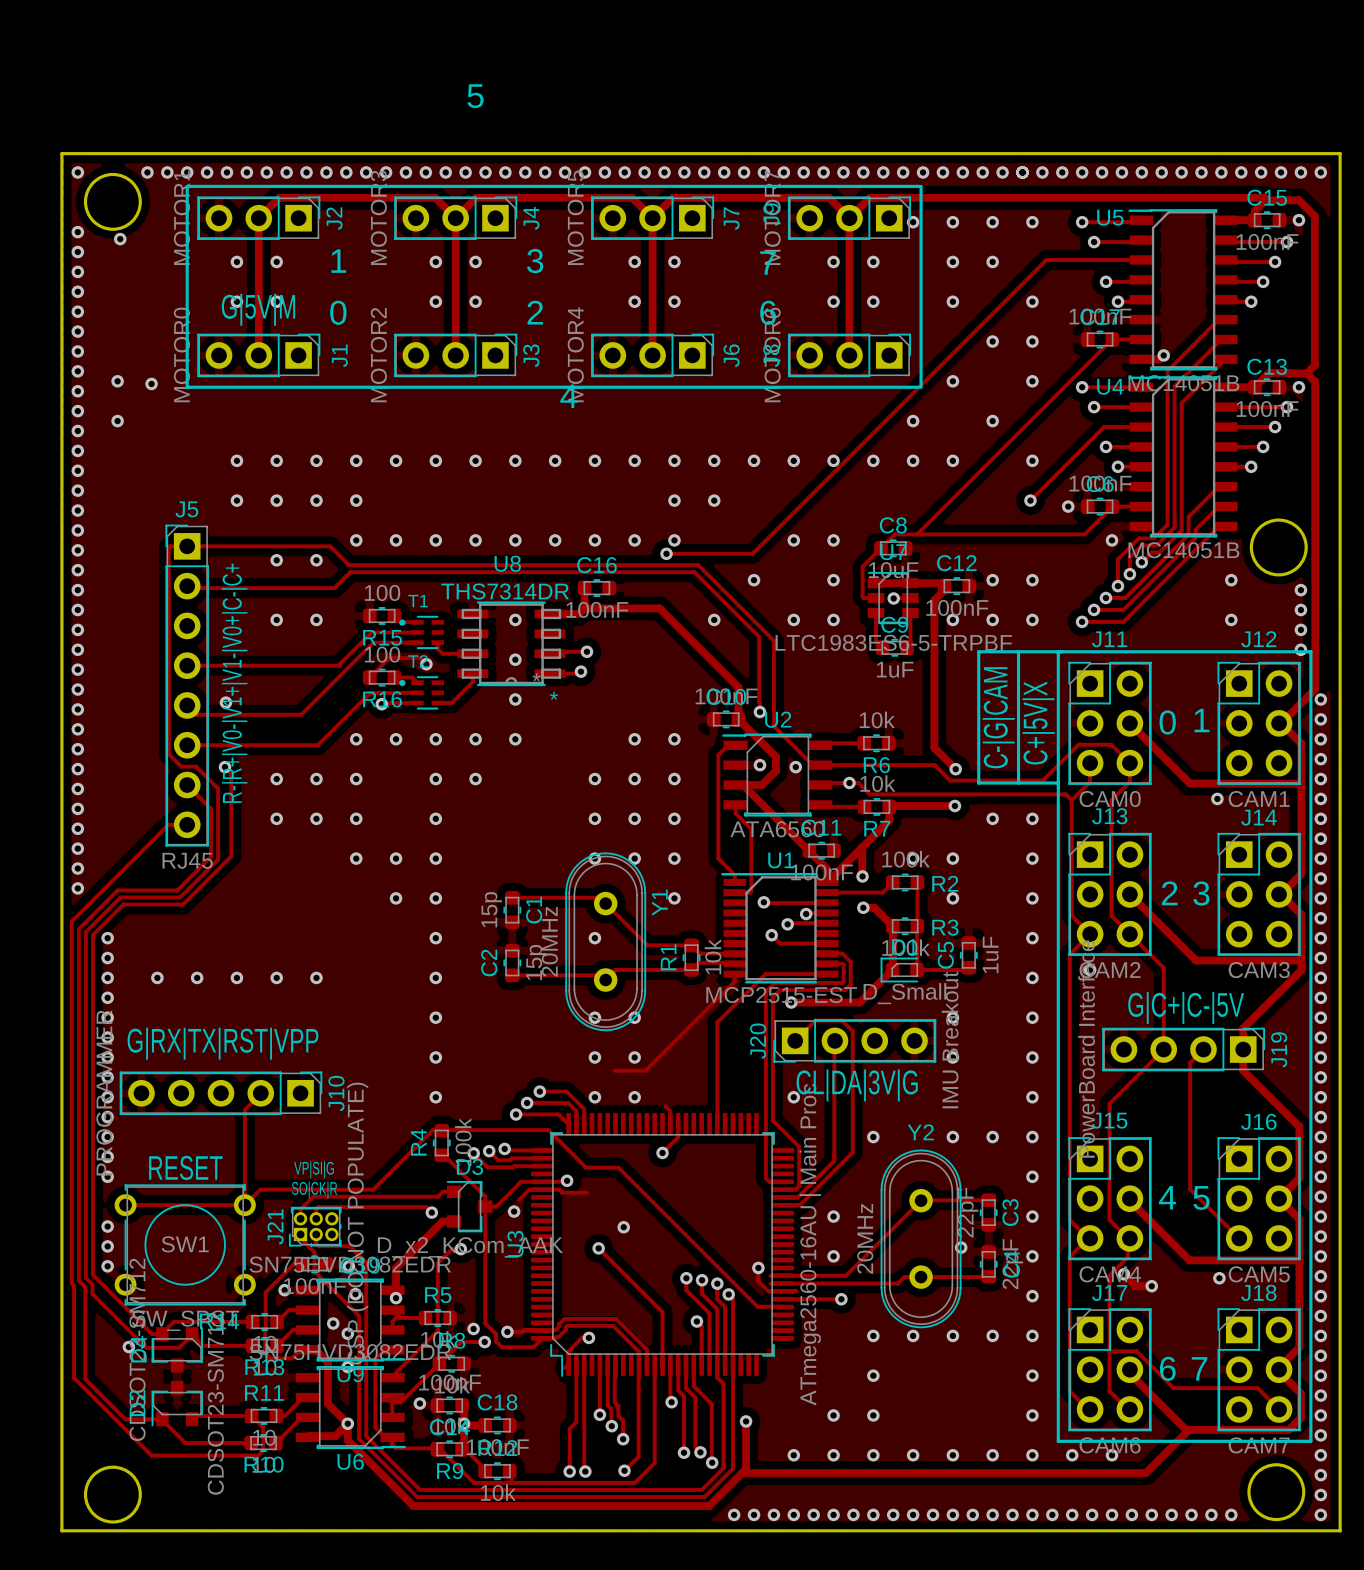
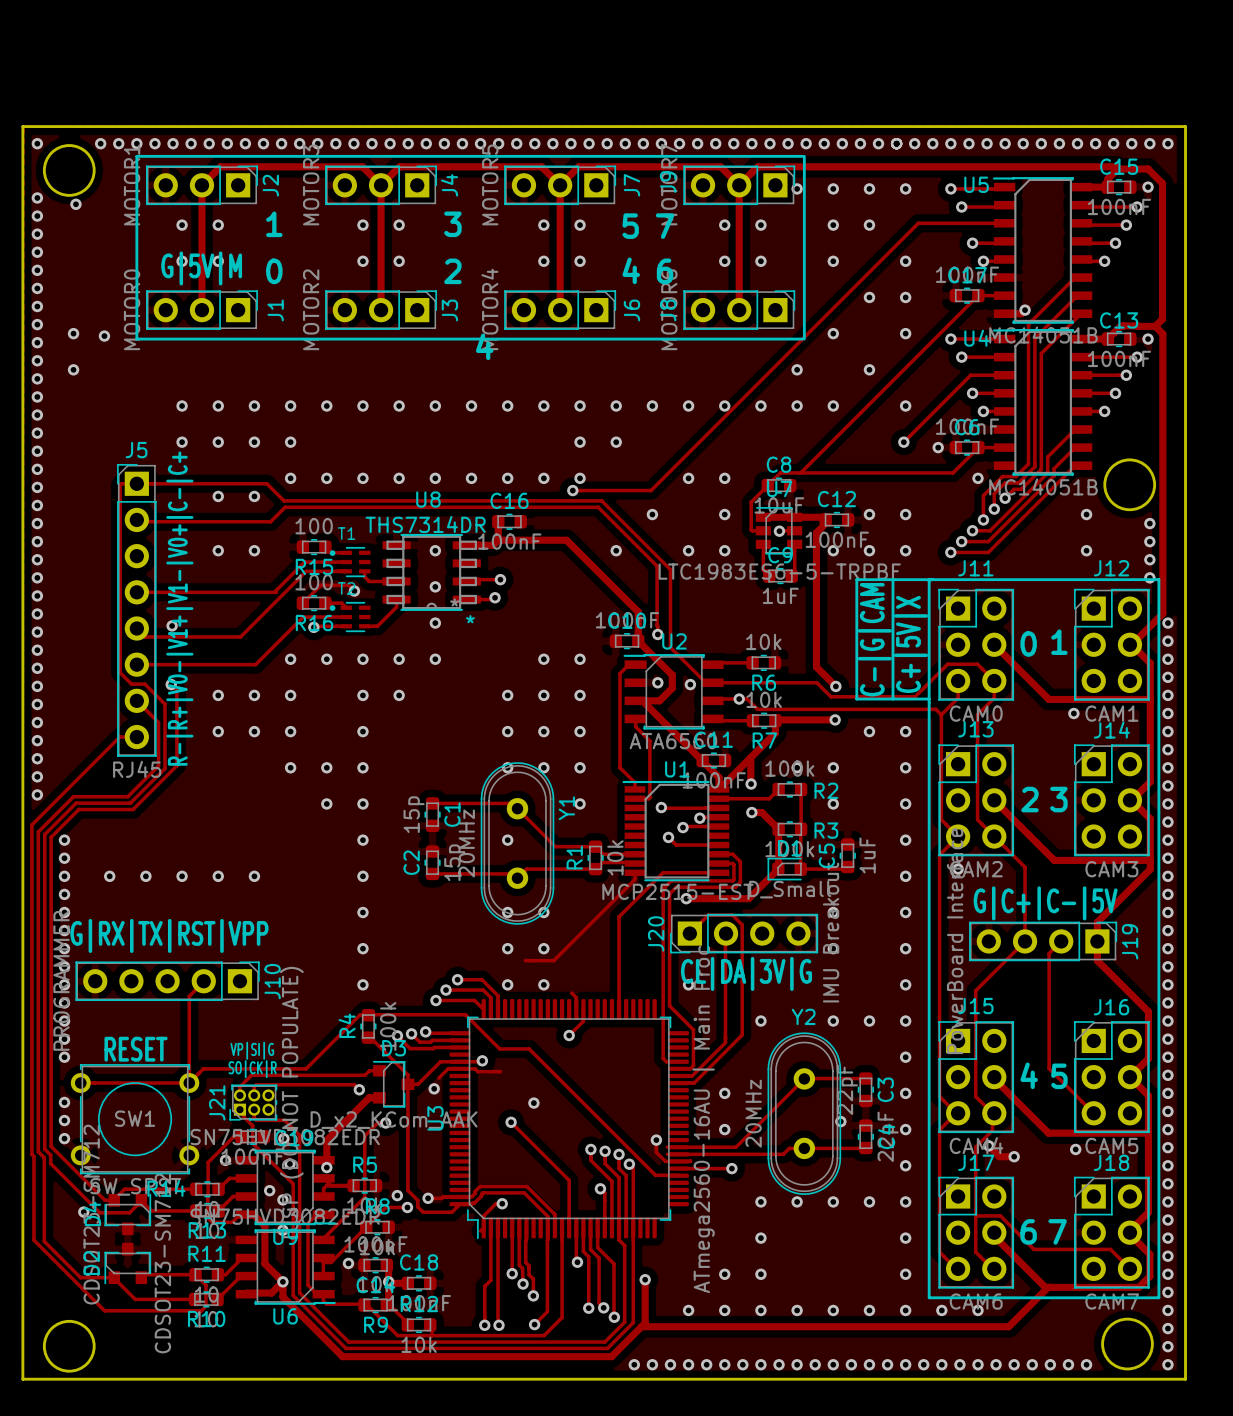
text position: 5 (475, 96) -> 5 (630, 226)
text: none -> 4 (631, 270)

